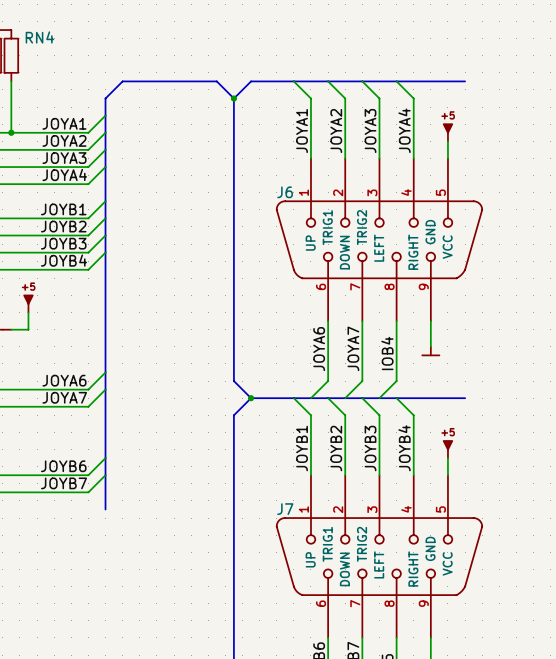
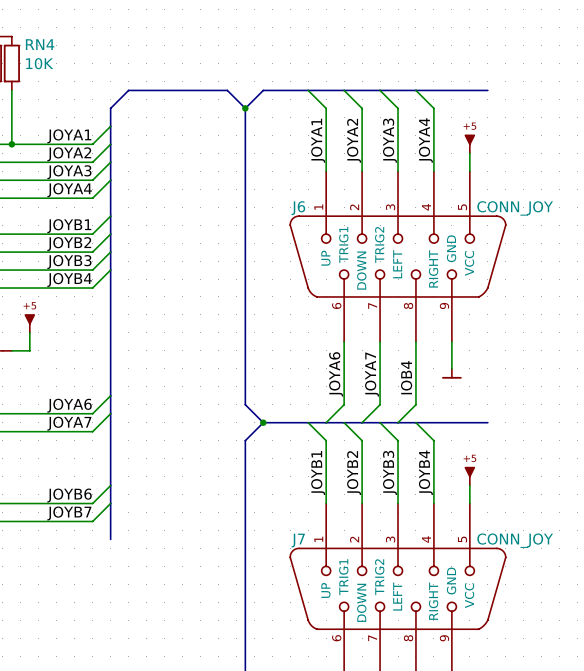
RN4 value: none -> 10K (39, 63)
J6 value: none -> CONN_JOY (515, 208)
J7 value: none -> CONN_JOY (515, 540)

